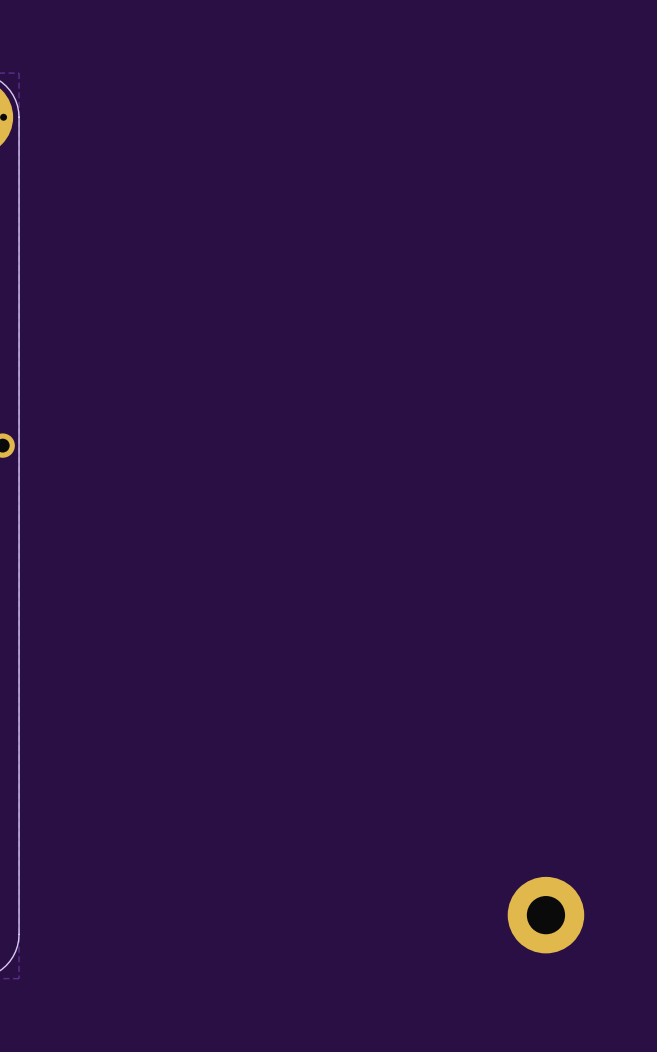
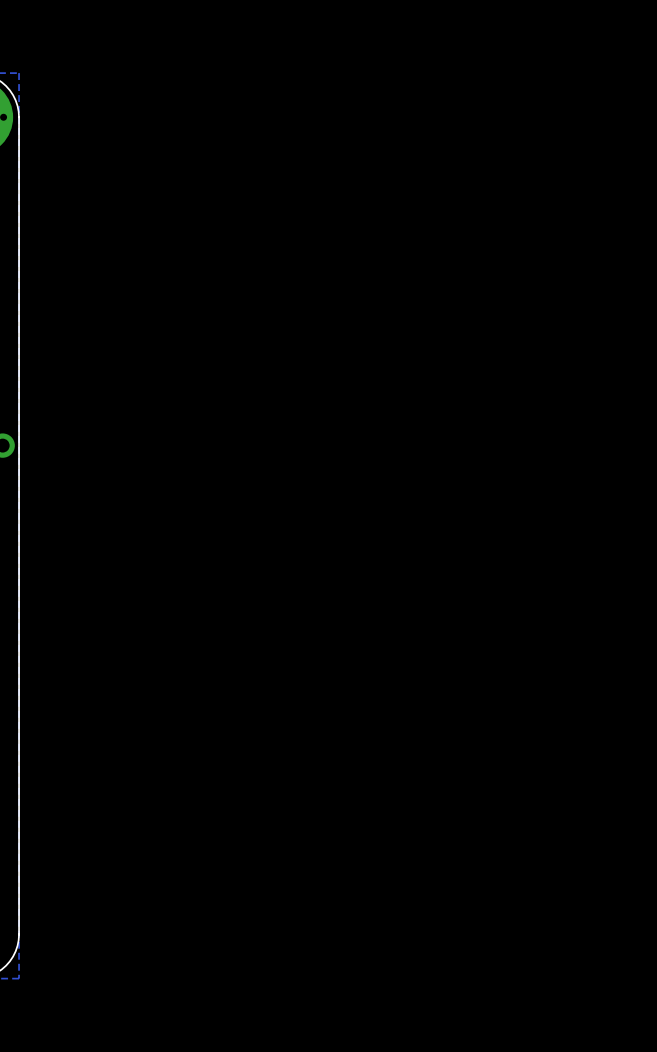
part: (545, 915) -> none

